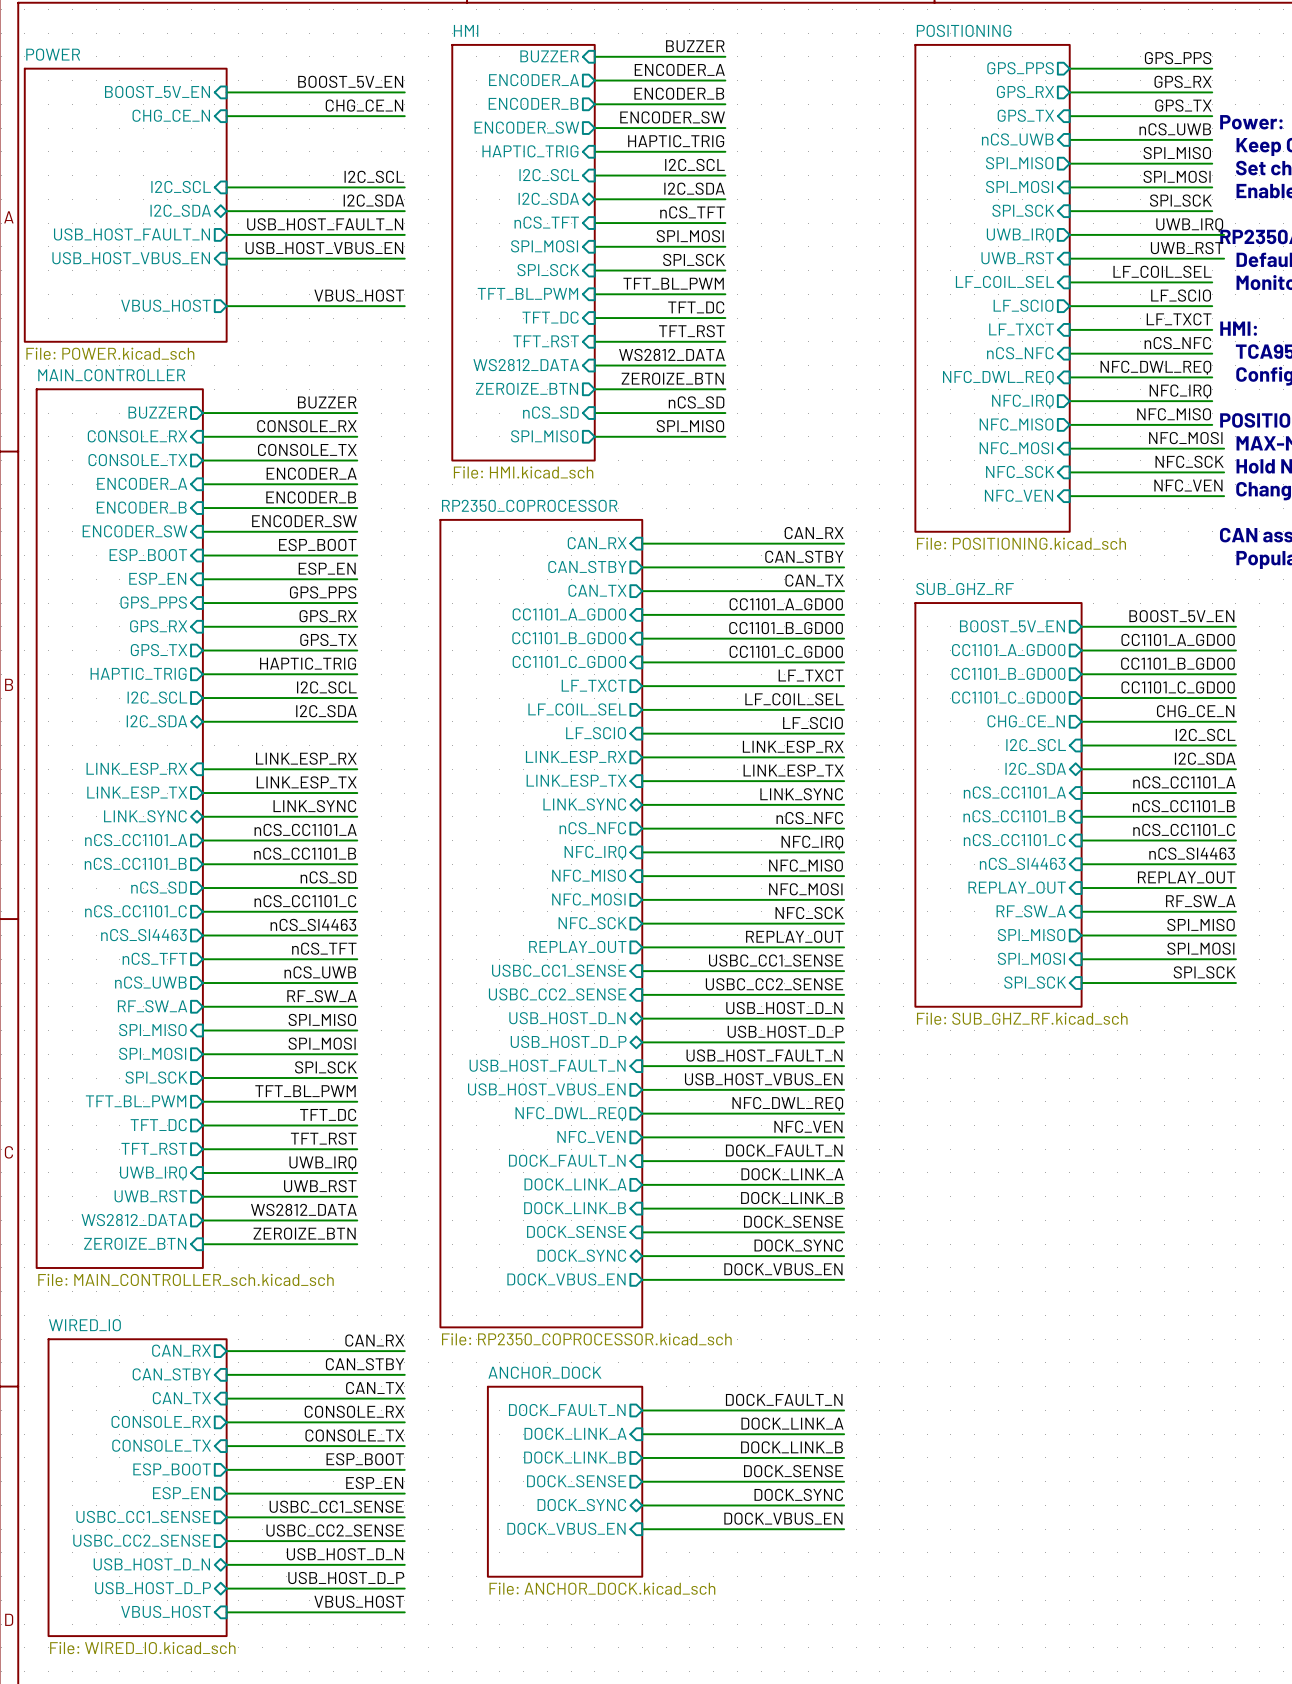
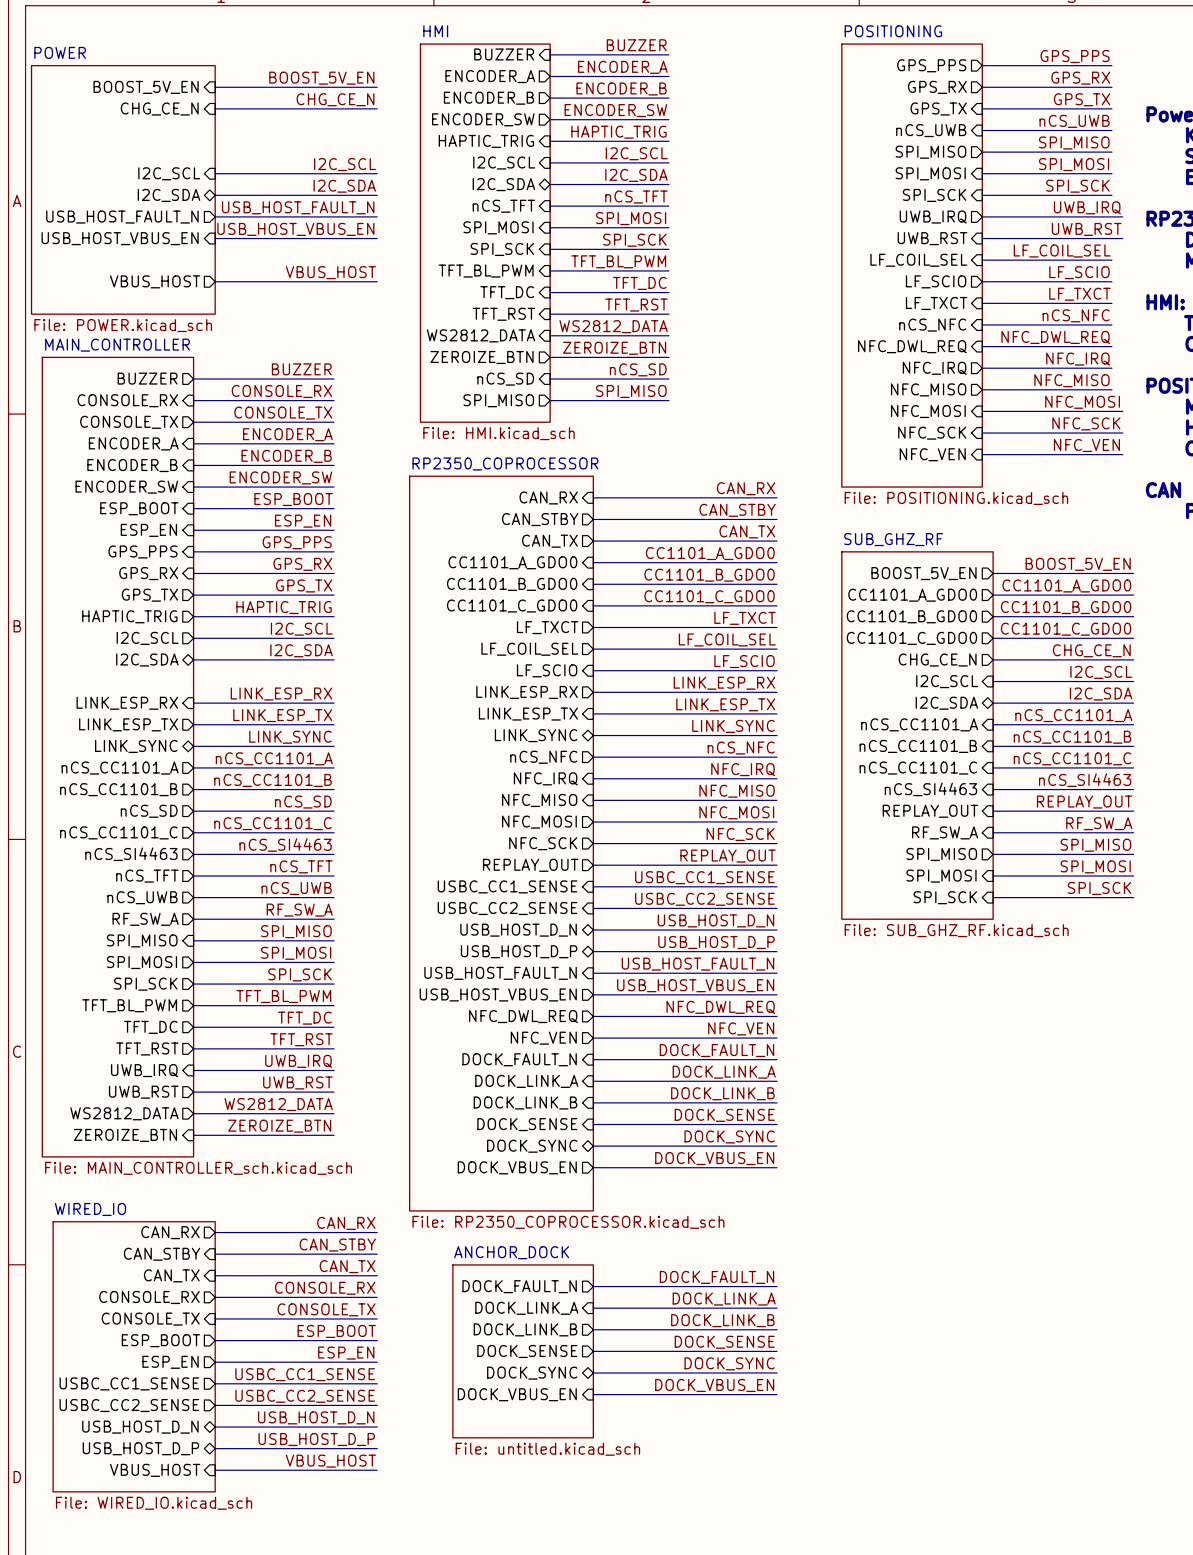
sheet pin shape: output (575, 1184) -> input (526, 1081)
sheet ANCHOR_DOCK value: File: ANCHOR_DOCK.kicad_sch (602, 1588) -> File: untitled.kicad_sch (547, 1449)

